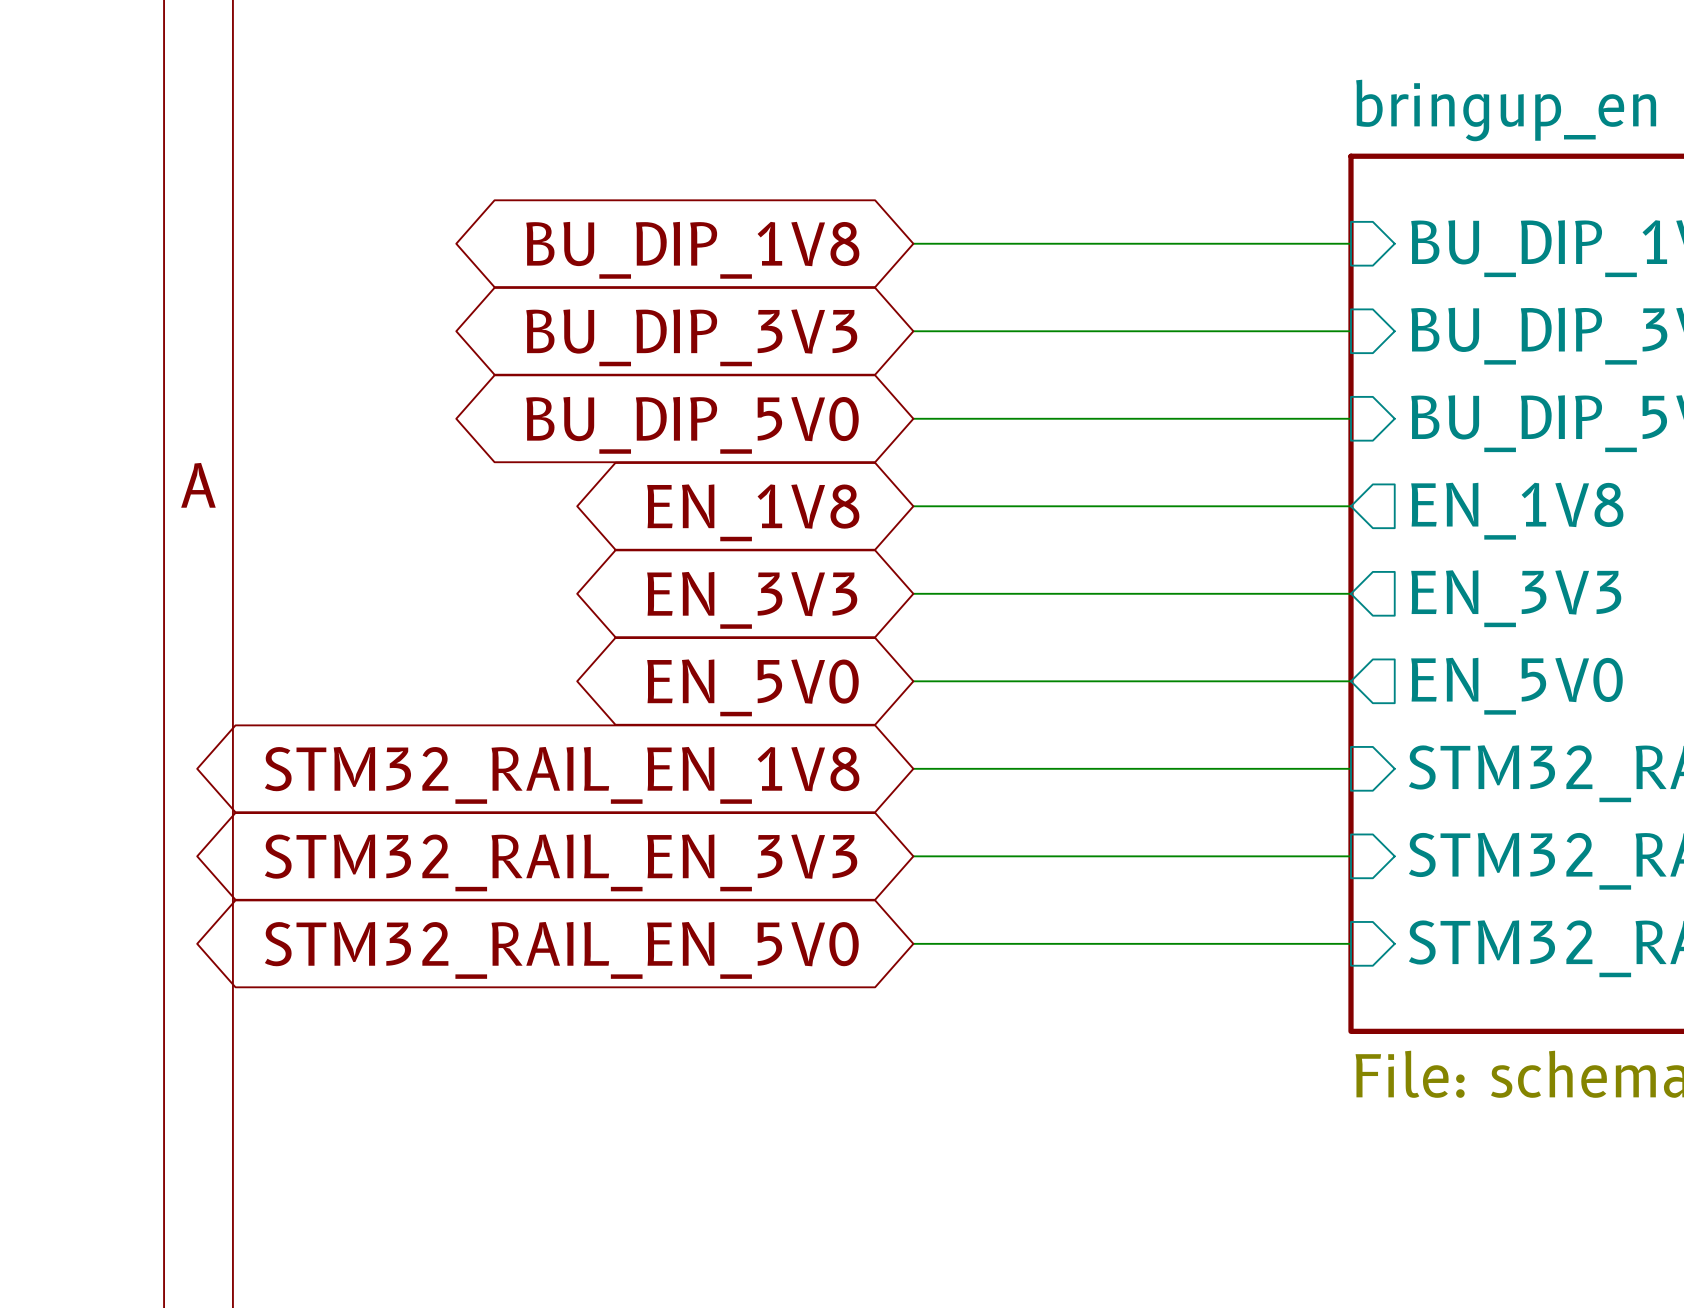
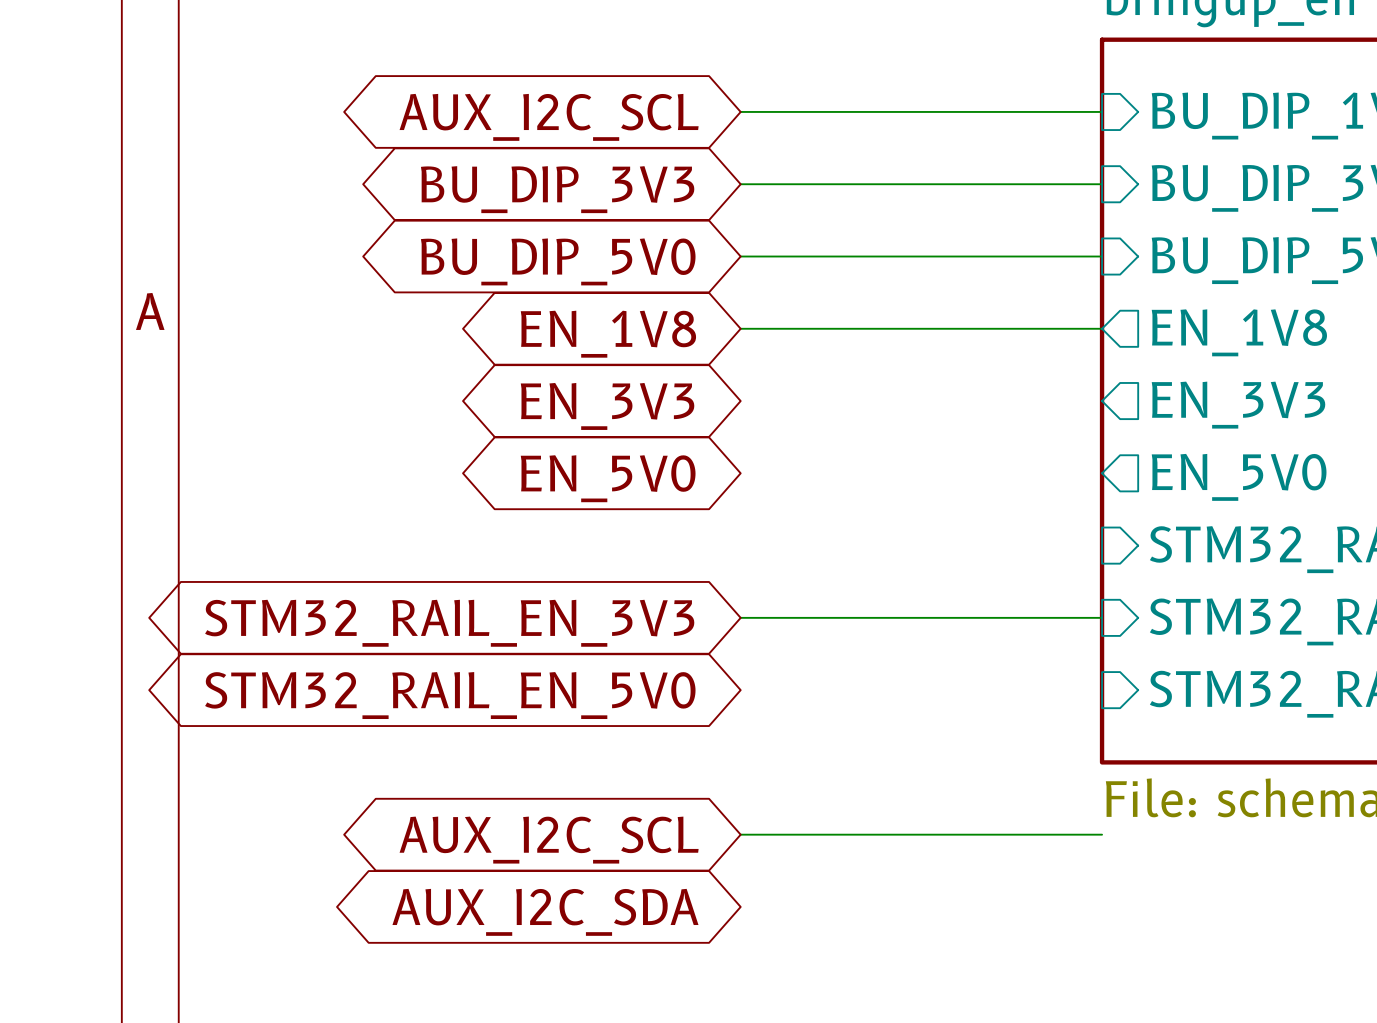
global label: BU_DIP_1V8 (692, 250) -> AUX_I2C_SCL (549, 117)
wire: (913, 593) (1350, 593) -> none
wire: (913, 681) (1350, 681) -> none
wire: (913, 768) (1350, 768) -> none
global label: STM32_RAIL_EN_1V8 (562, 775) -> none
wire: (913, 943) (1350, 943) -> (740, 834) (1102, 834)
global label: none -> AUX_I2C_SCL (549, 840)
global label: none -> AUX_I2C_SDA (545, 912)

